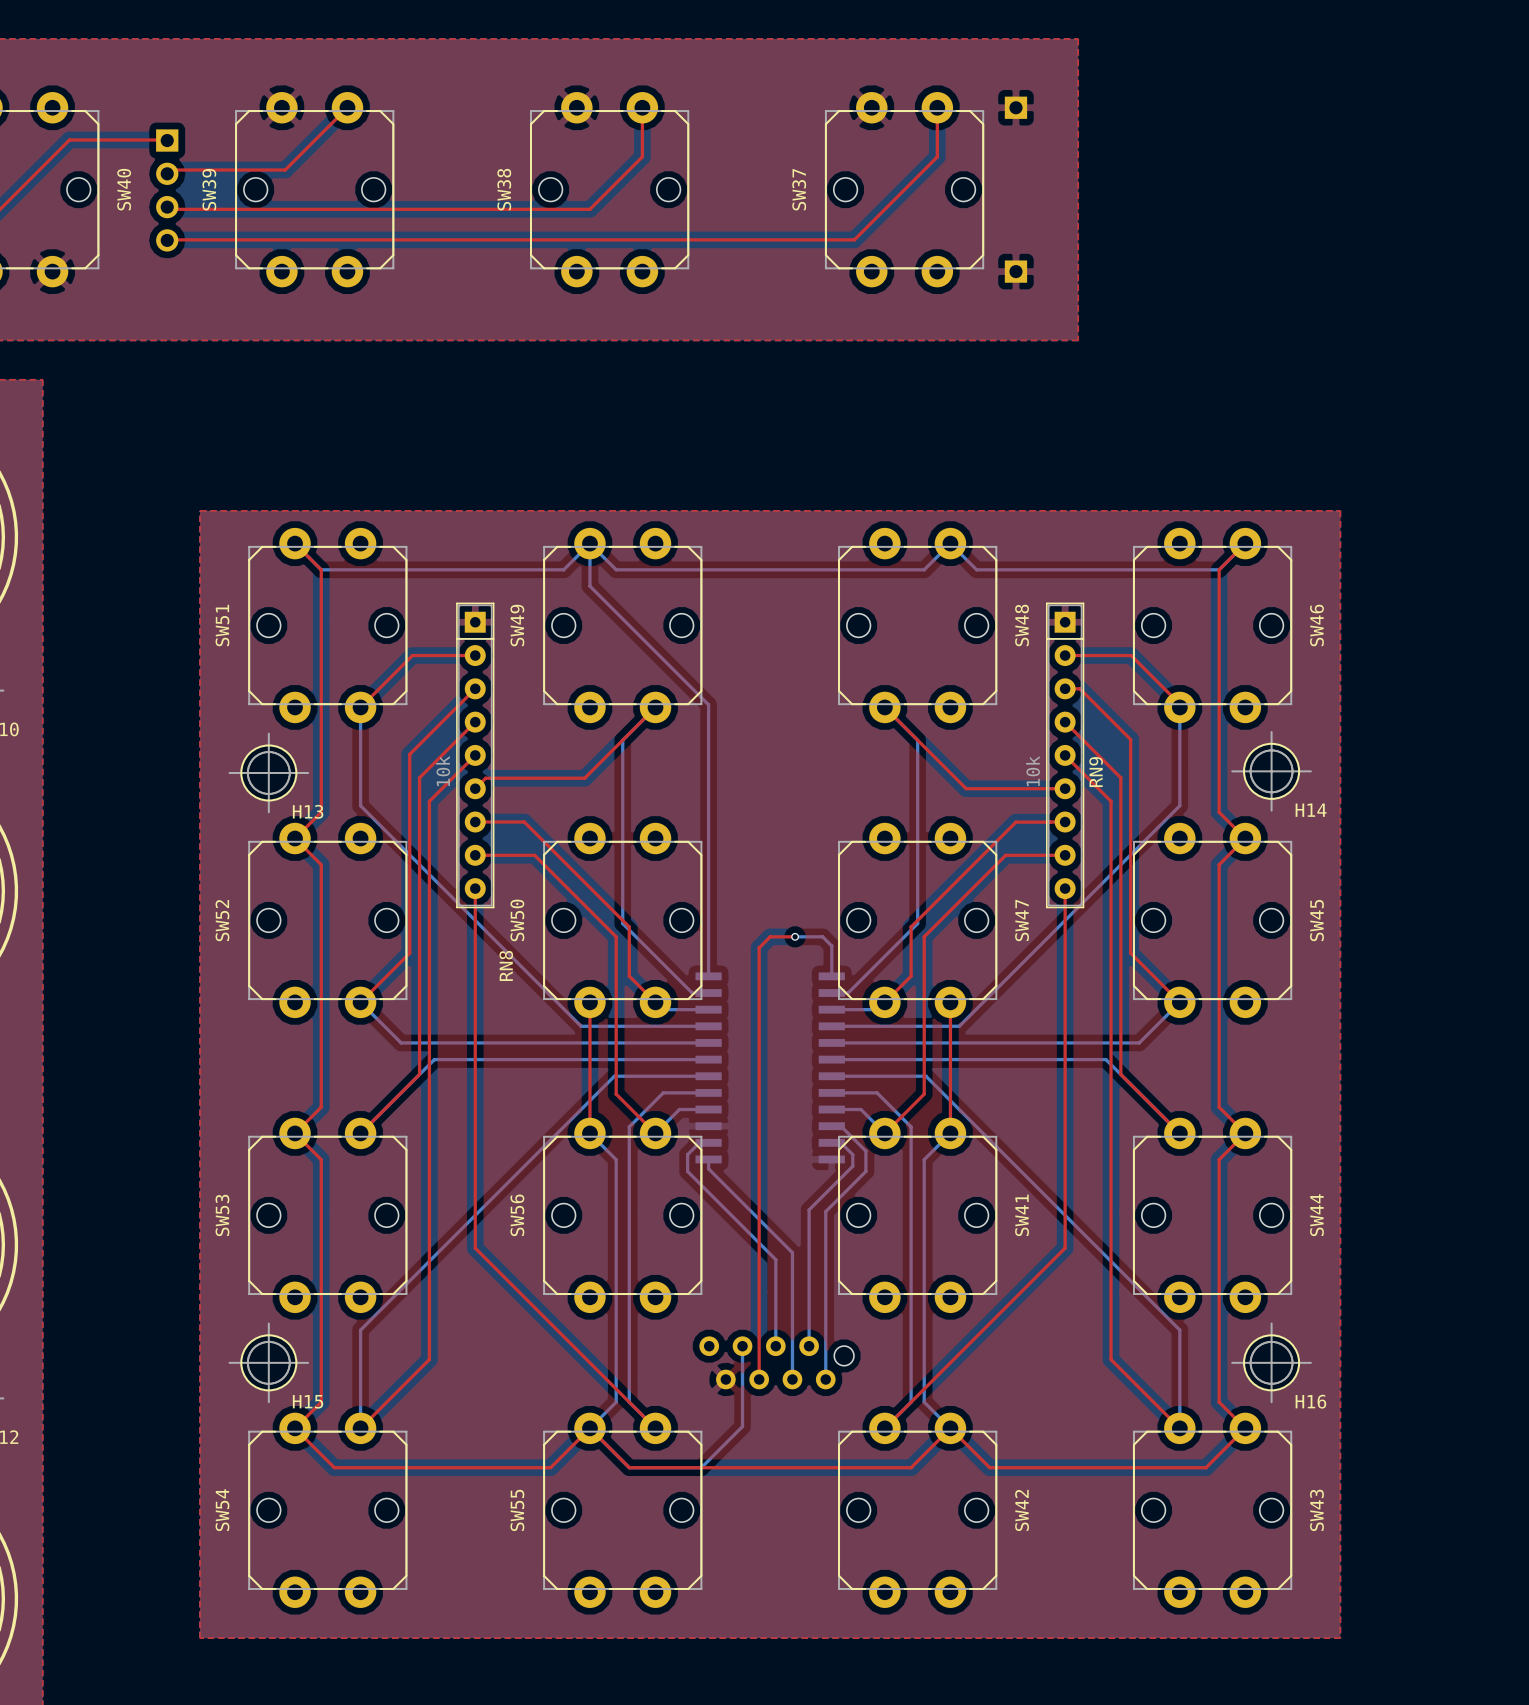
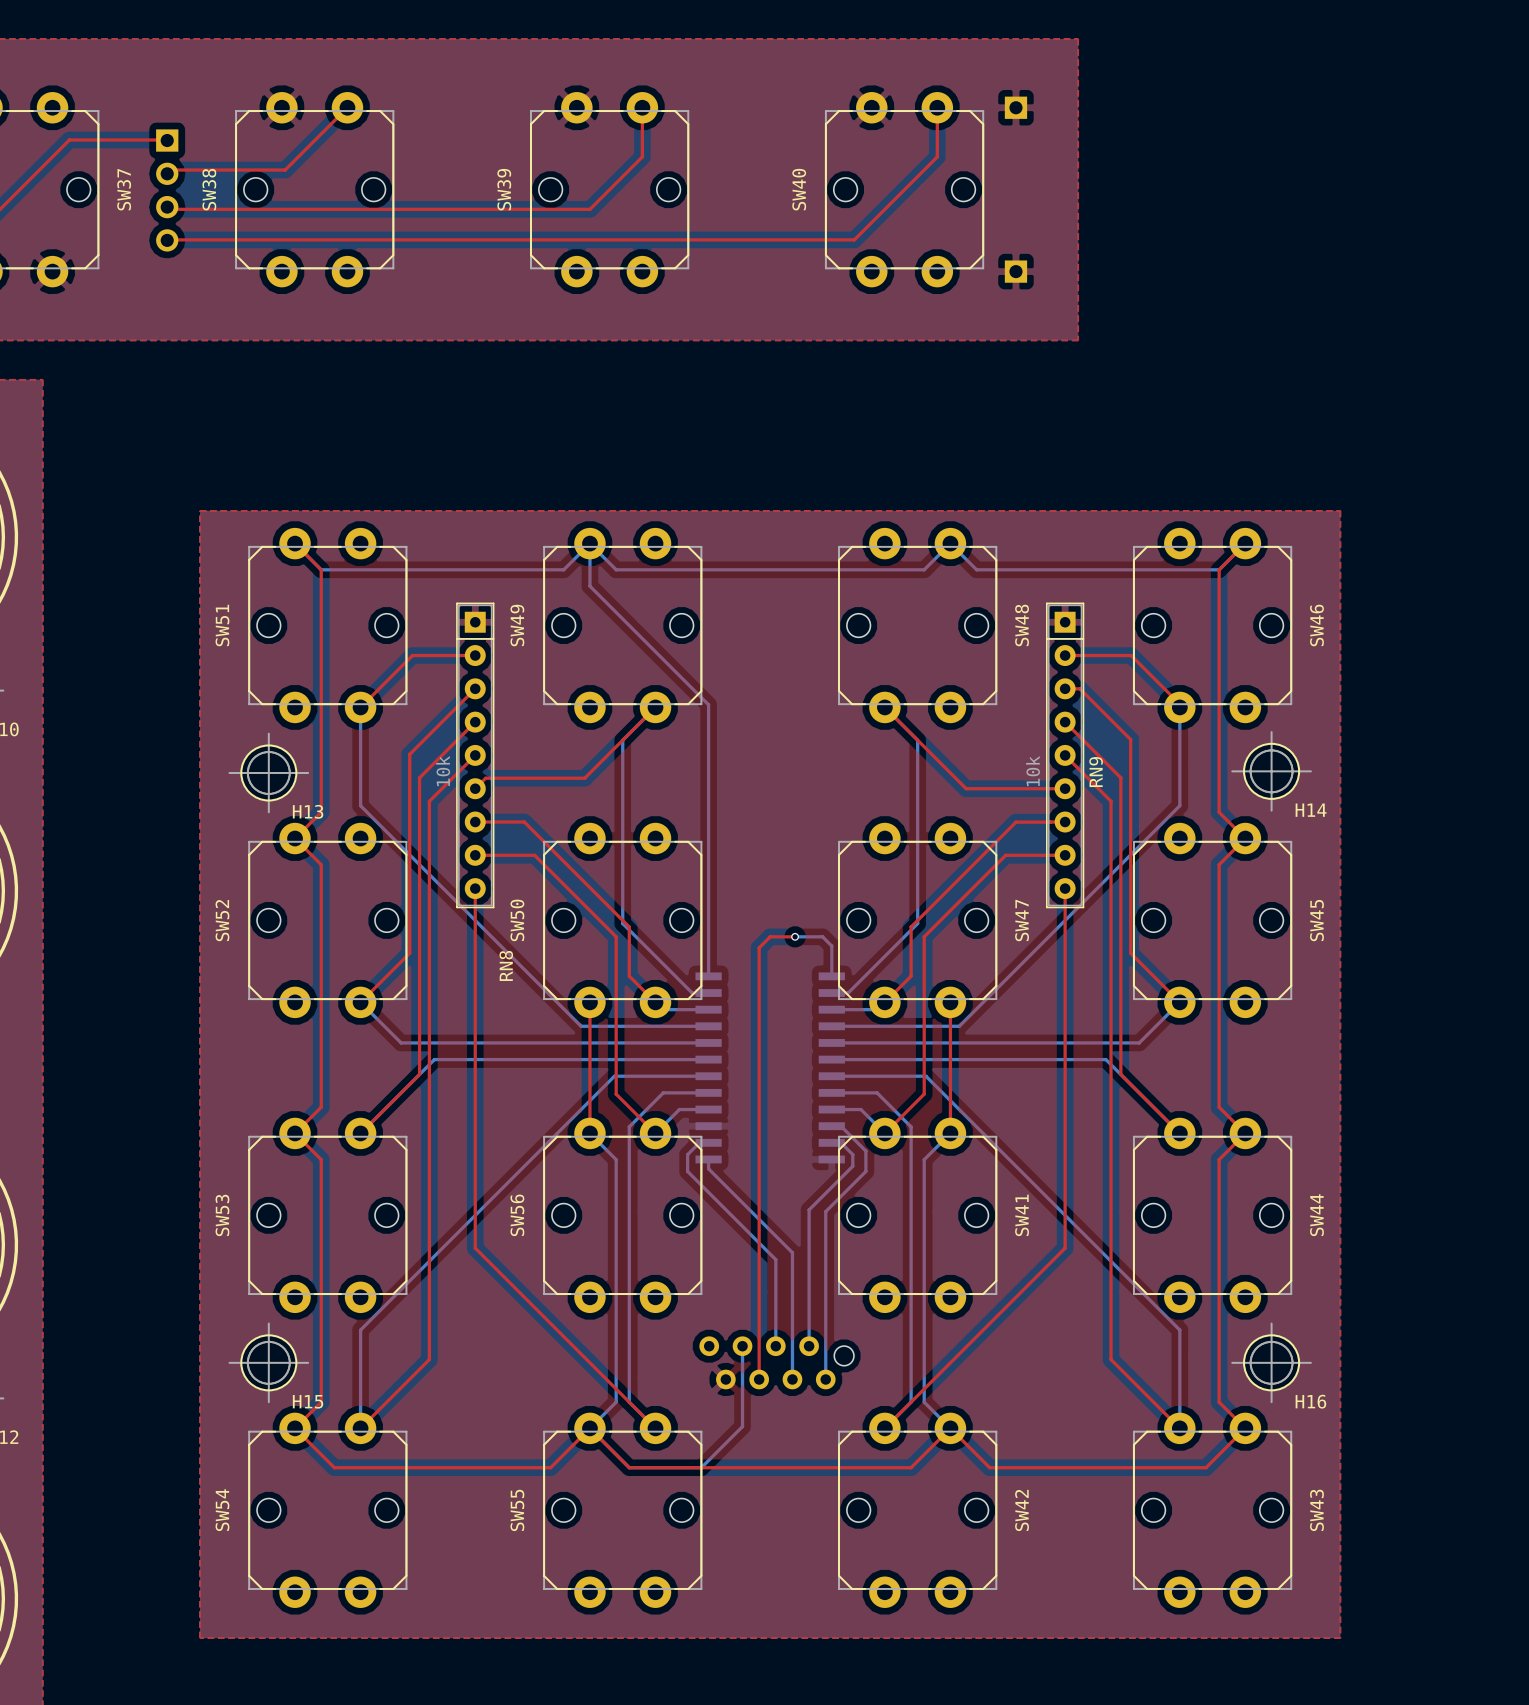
SW40 name: SW40 (124, 189) -> SW37 (124, 189)
SW39 name: SW39 (209, 189) -> SW38 (209, 189)
SW38 name: SW38 (504, 189) -> SW39 (504, 189)
SW37 name: SW37 (799, 189) -> SW40 (799, 189)

